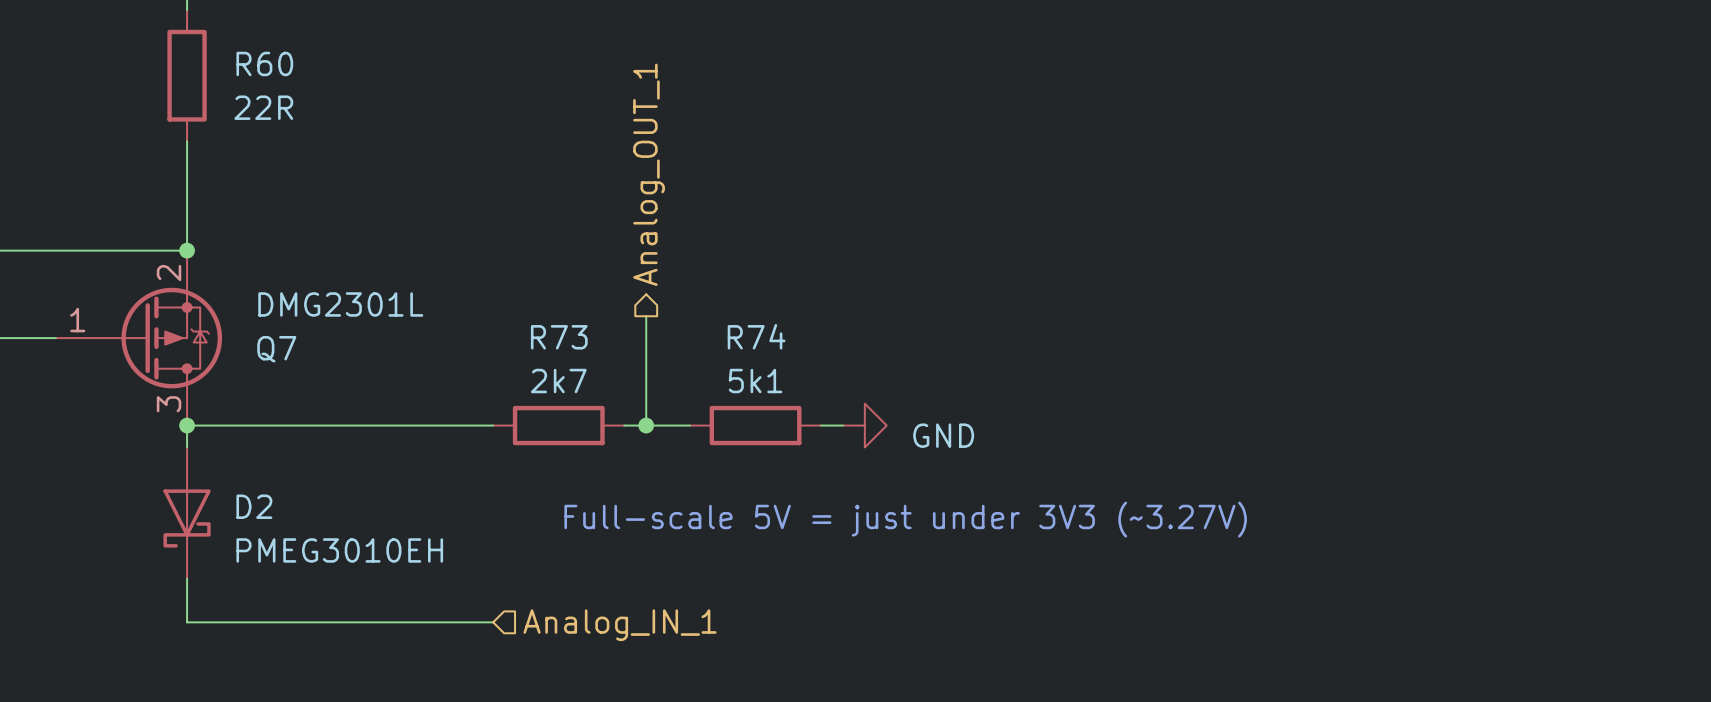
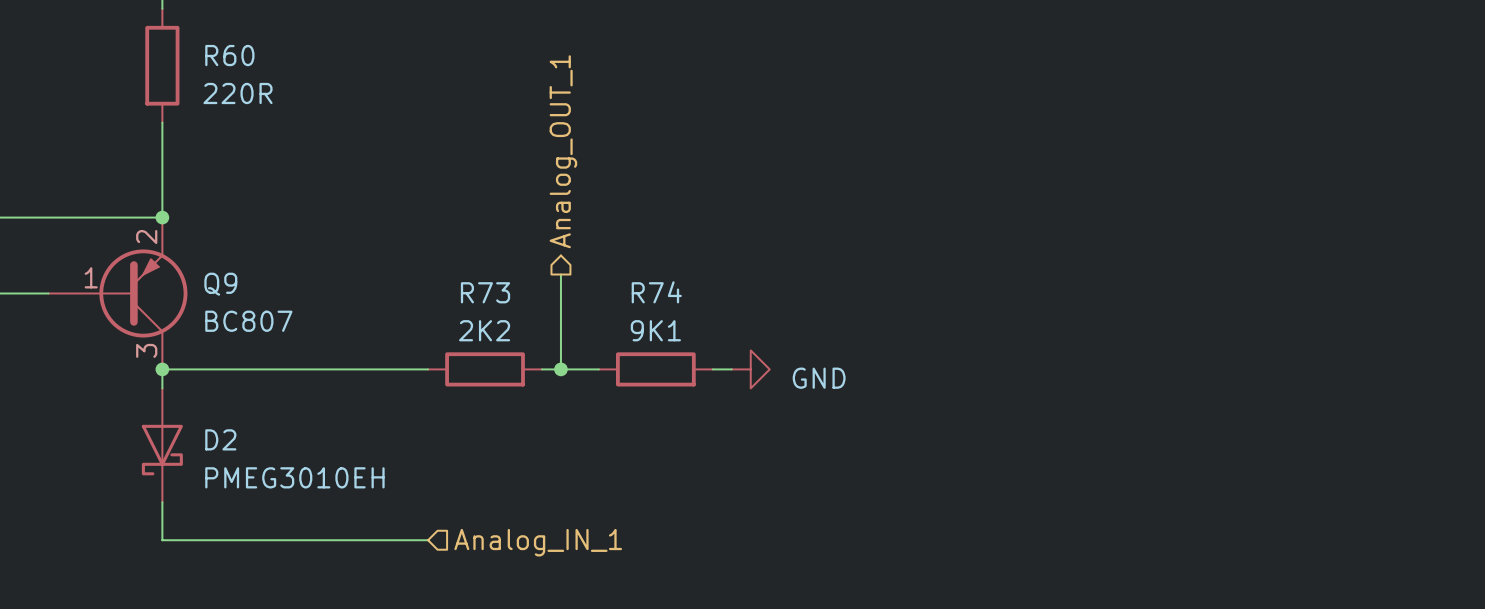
R60 value: 22R (263, 107) -> 220R (237, 93)
Q9: none -> BC807 (117, 293)
Q7: DMG2301L (138, 338) -> none
R73 value: 2k7 (558, 381) -> 2K2 (484, 330)
R74 value: 5k1 (755, 381) -> 9K1 (655, 330)
text: Full-scale 5V = just under 3V3 (~3.27V) (905, 519) -> none

